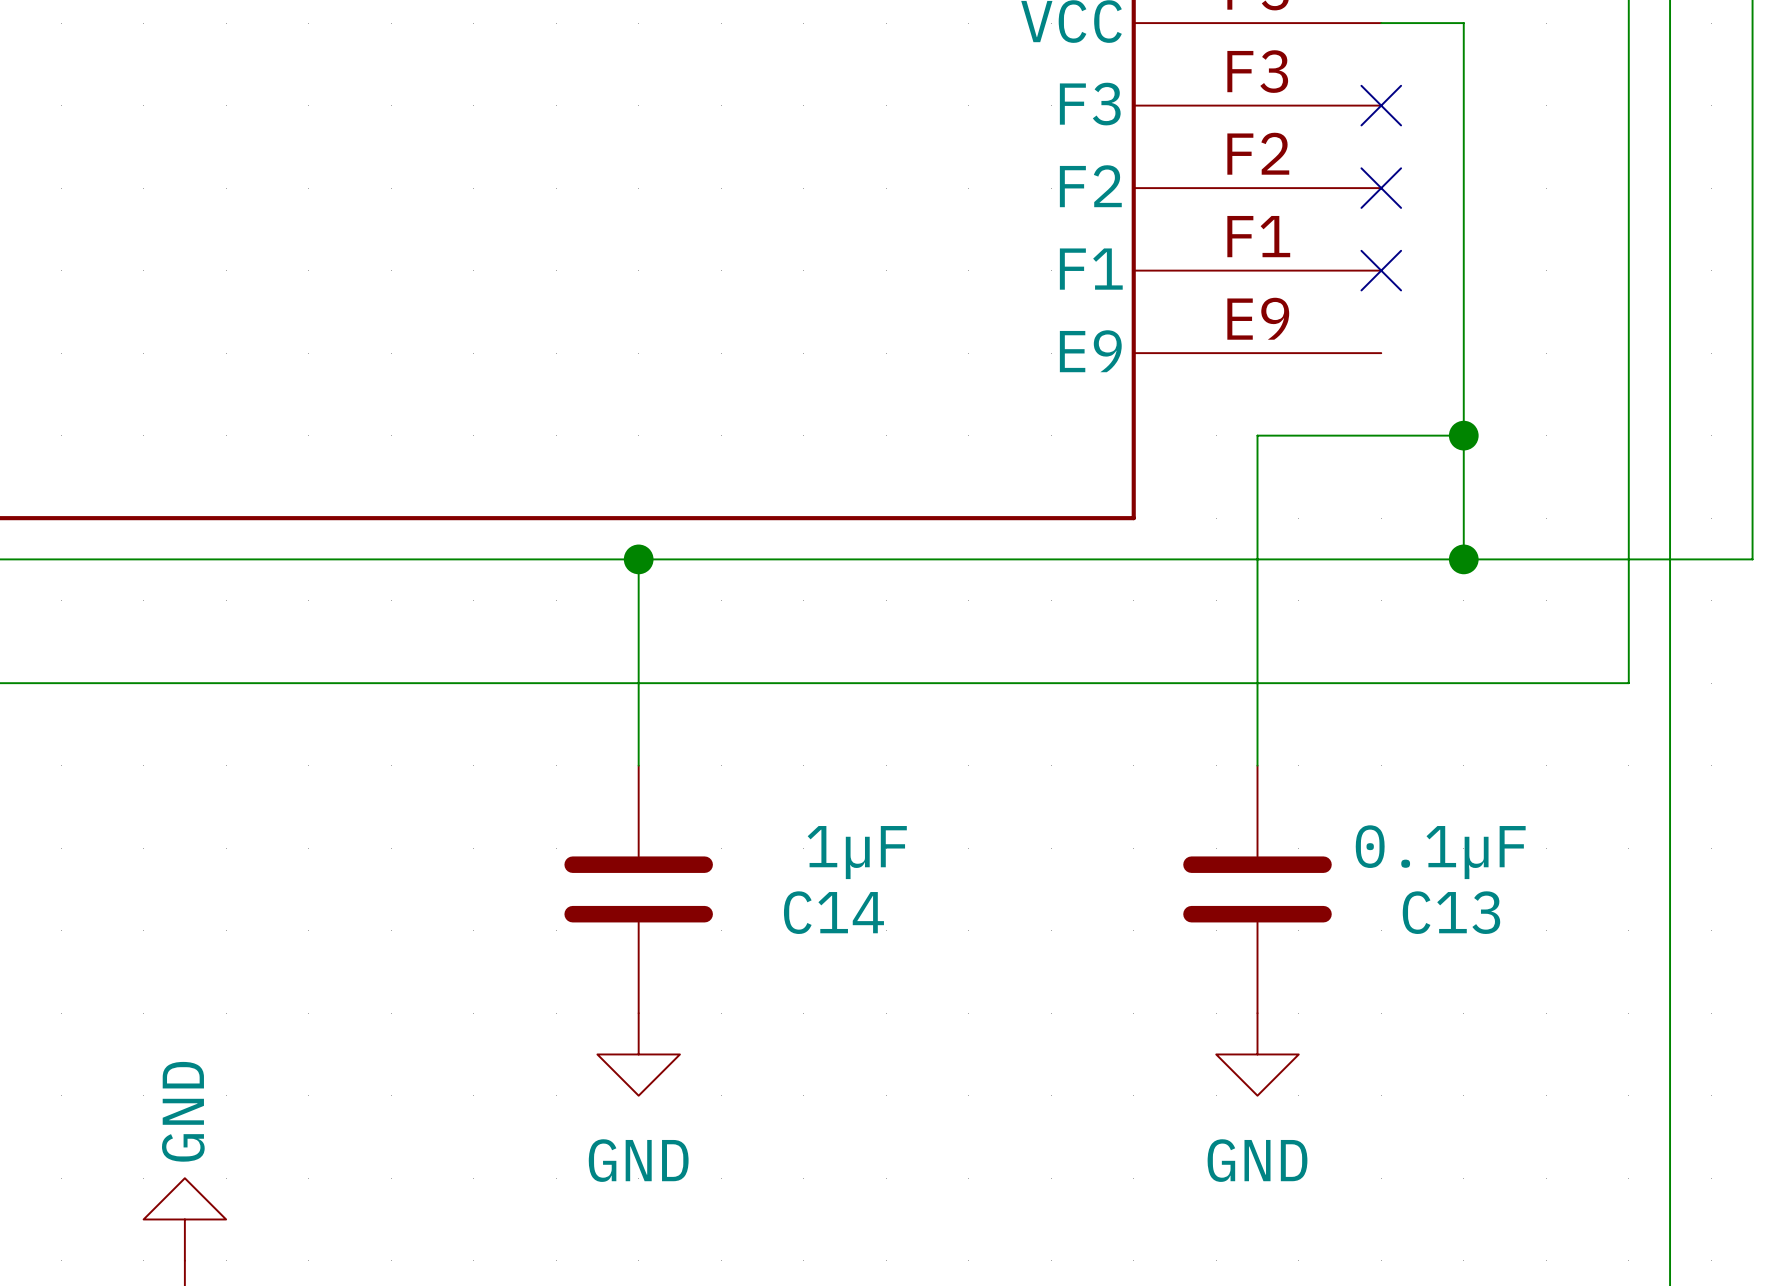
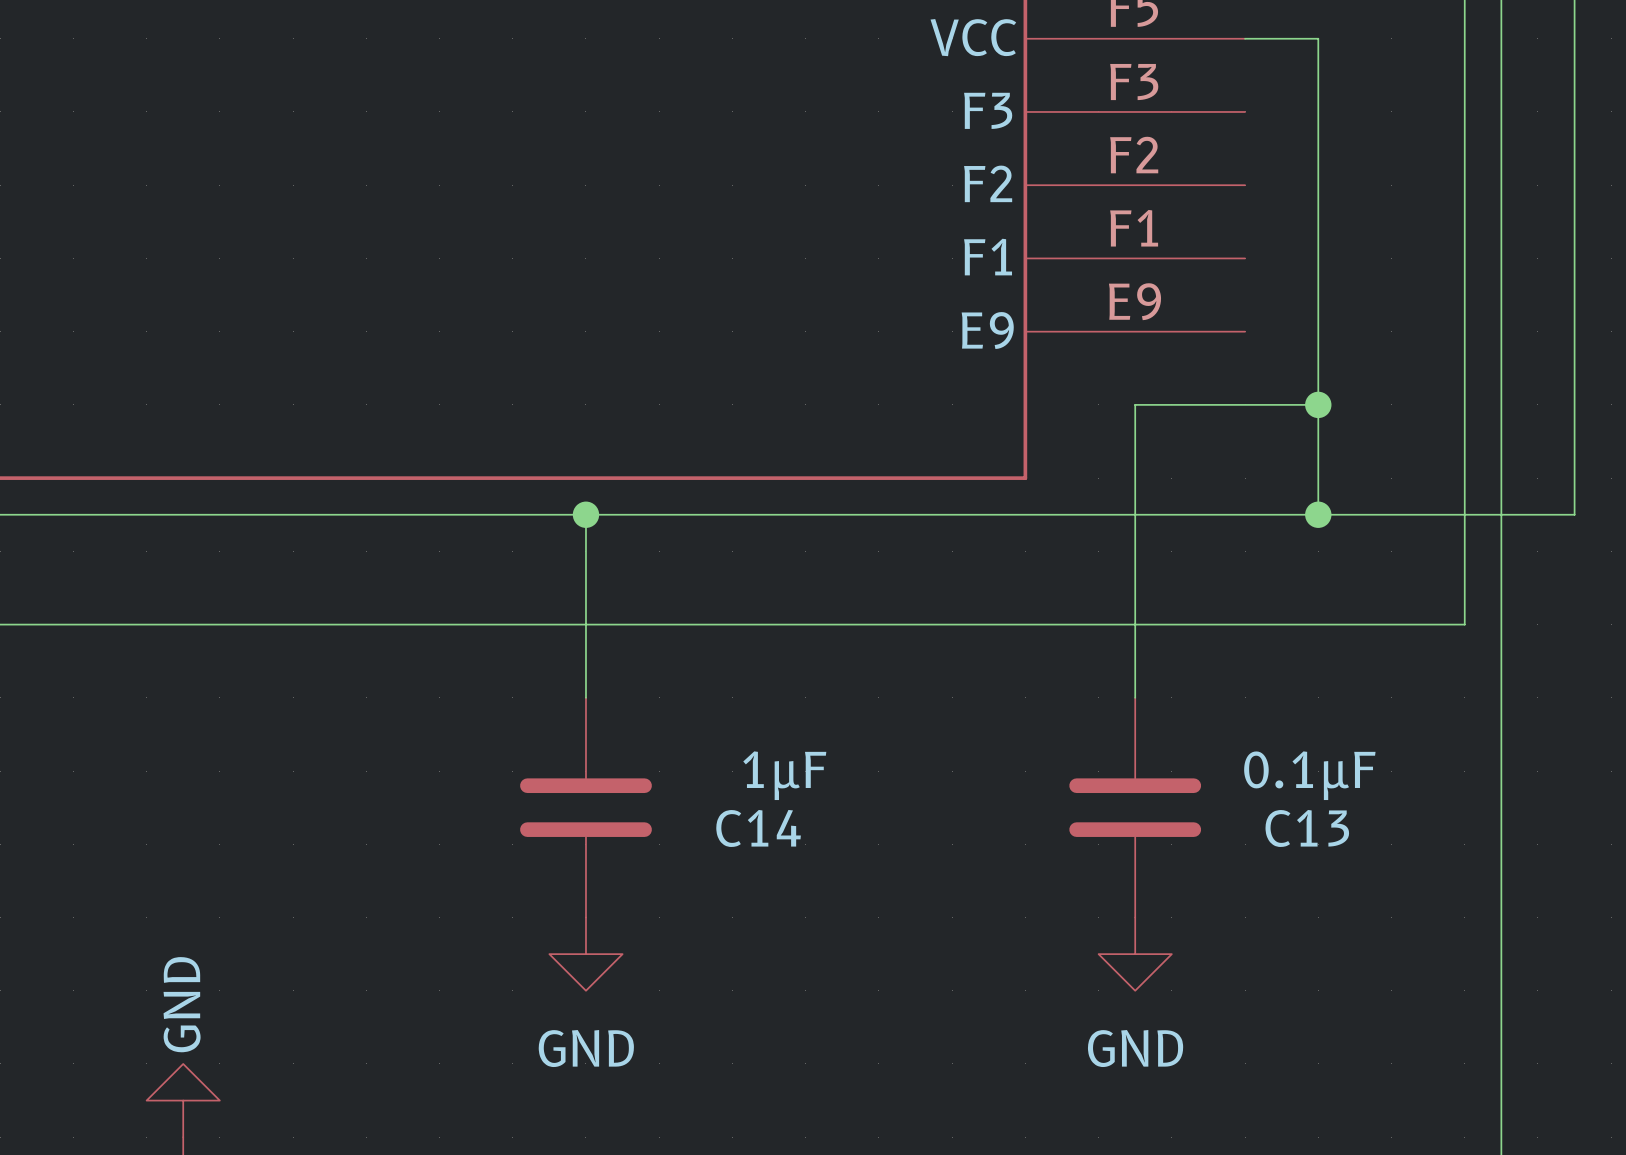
no-connect mark: (1381, 105) -> none
no-connect mark: (1381, 188) -> none
no-connect mark: (1381, 270) -> none

